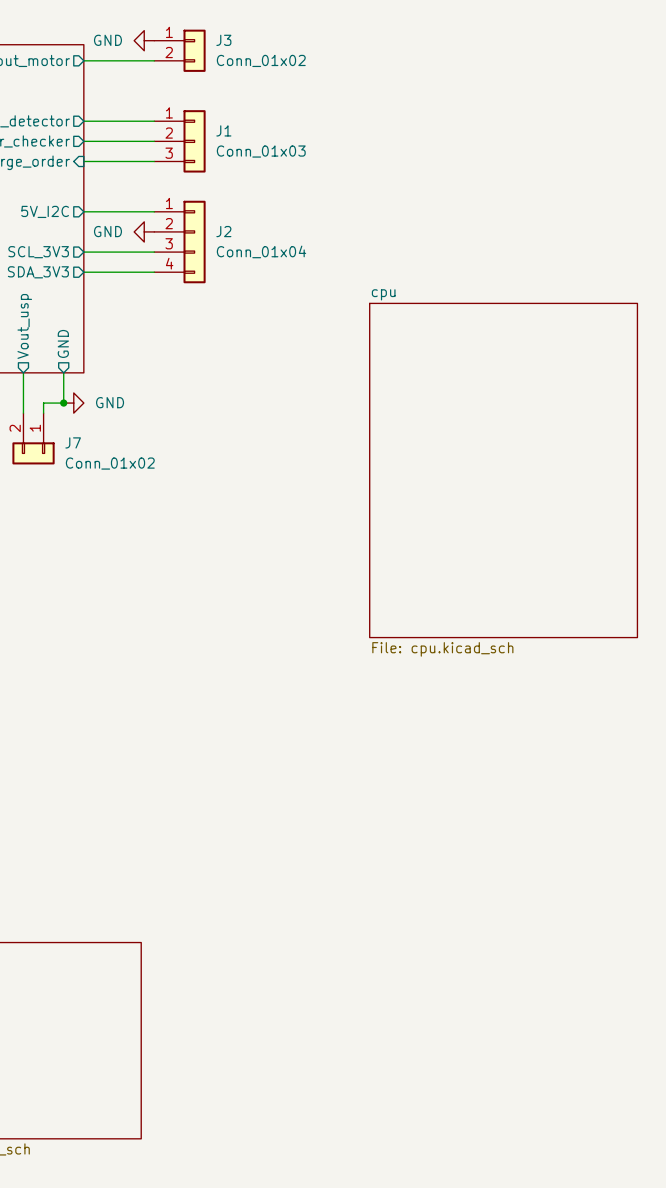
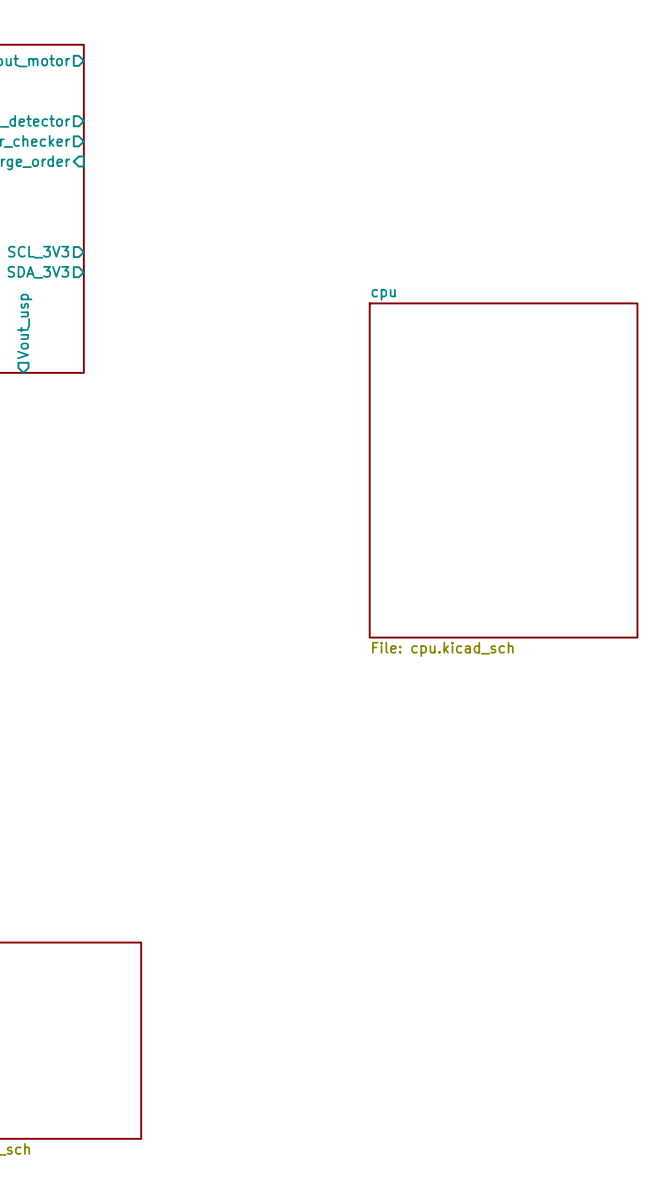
power symbol: GND (144, 40) -> none
J3: Conn_01x02 (179, 50) -> none
wire: (83, 60) (154, 60) -> none
wire: (83, 121) (154, 121) -> none
wire: (83, 141) (154, 141) -> none
J1: Conn_01x03 (179, 141) -> none
wire: (83, 161) (154, 161) -> none
sheet pin: 5V_I2C (45, 211) -> none
wire: (83, 211) (154, 211) -> none
power symbol: GND (144, 231) -> none
J2: Conn_01x04 (179, 242) -> none
wire: (83, 252) (154, 252) -> none
wire: (83, 272) (154, 272) -> none
sheet pin: GND (63, 343) -> none
wire: (23, 372) (23, 413) -> none
wire: (63, 372) (63, 403) (43, 403) (43, 413) -> none
junction: (63, 403) -> none
power symbol: GND (73, 403) -> none
J7: Conn_01x02 (33, 438) -> none

